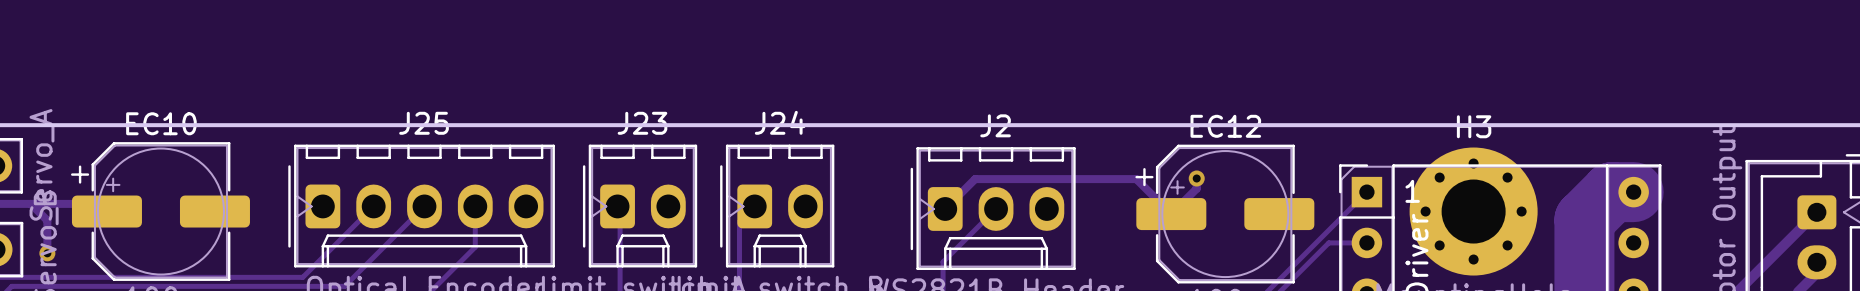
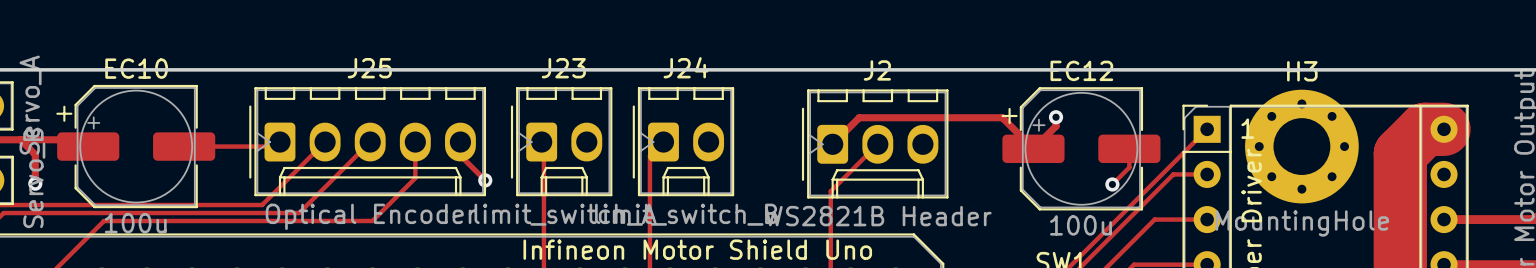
track: none -> (279, 142) (275, 146) (184, 146)
track: none -> (460, 142) (460, 155) (485, 180)
track: none -> (1129, 148) (1129, 167) (1112, 184)
via: none -> (485, 180)
via: none -> (1112, 184)

